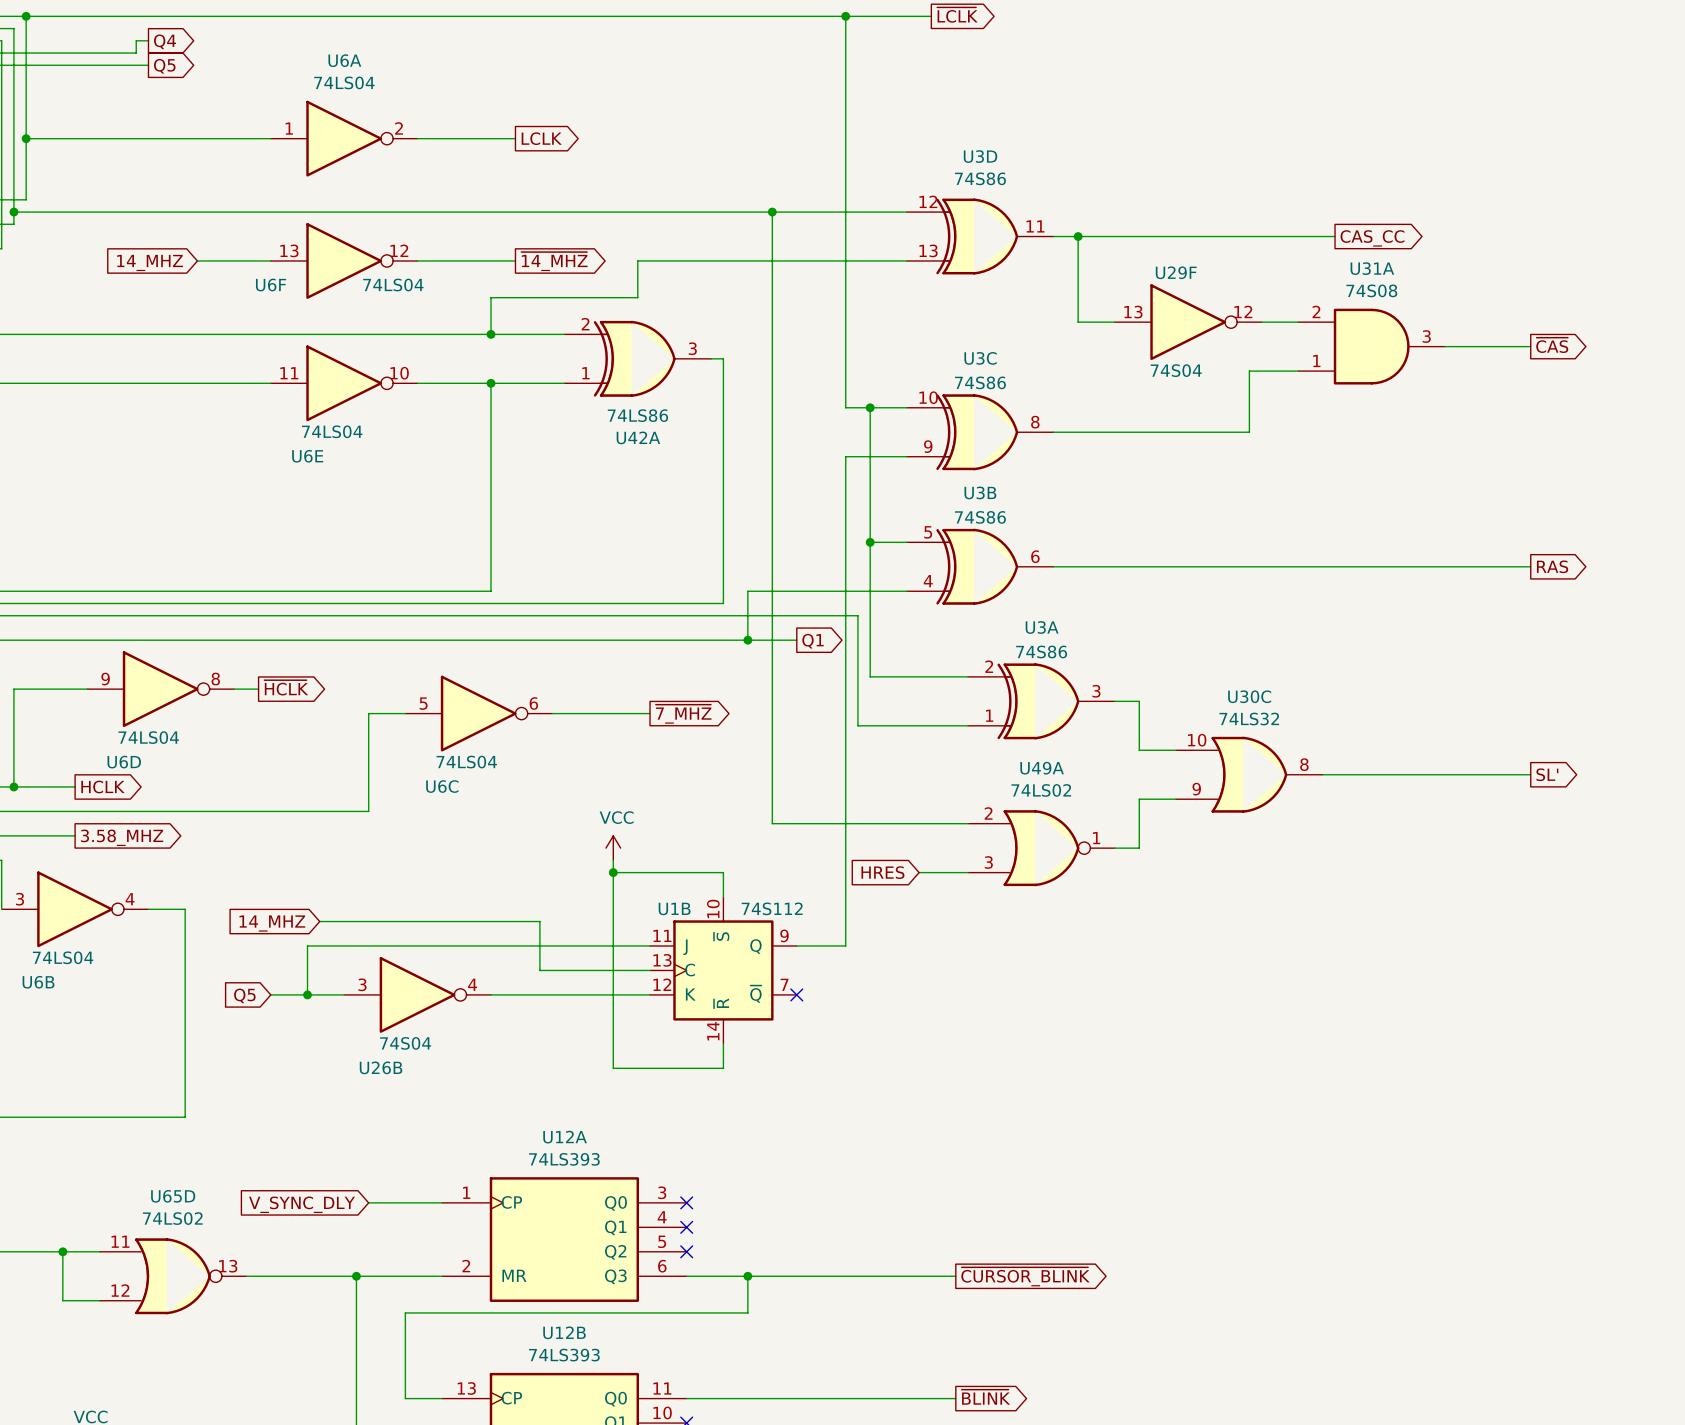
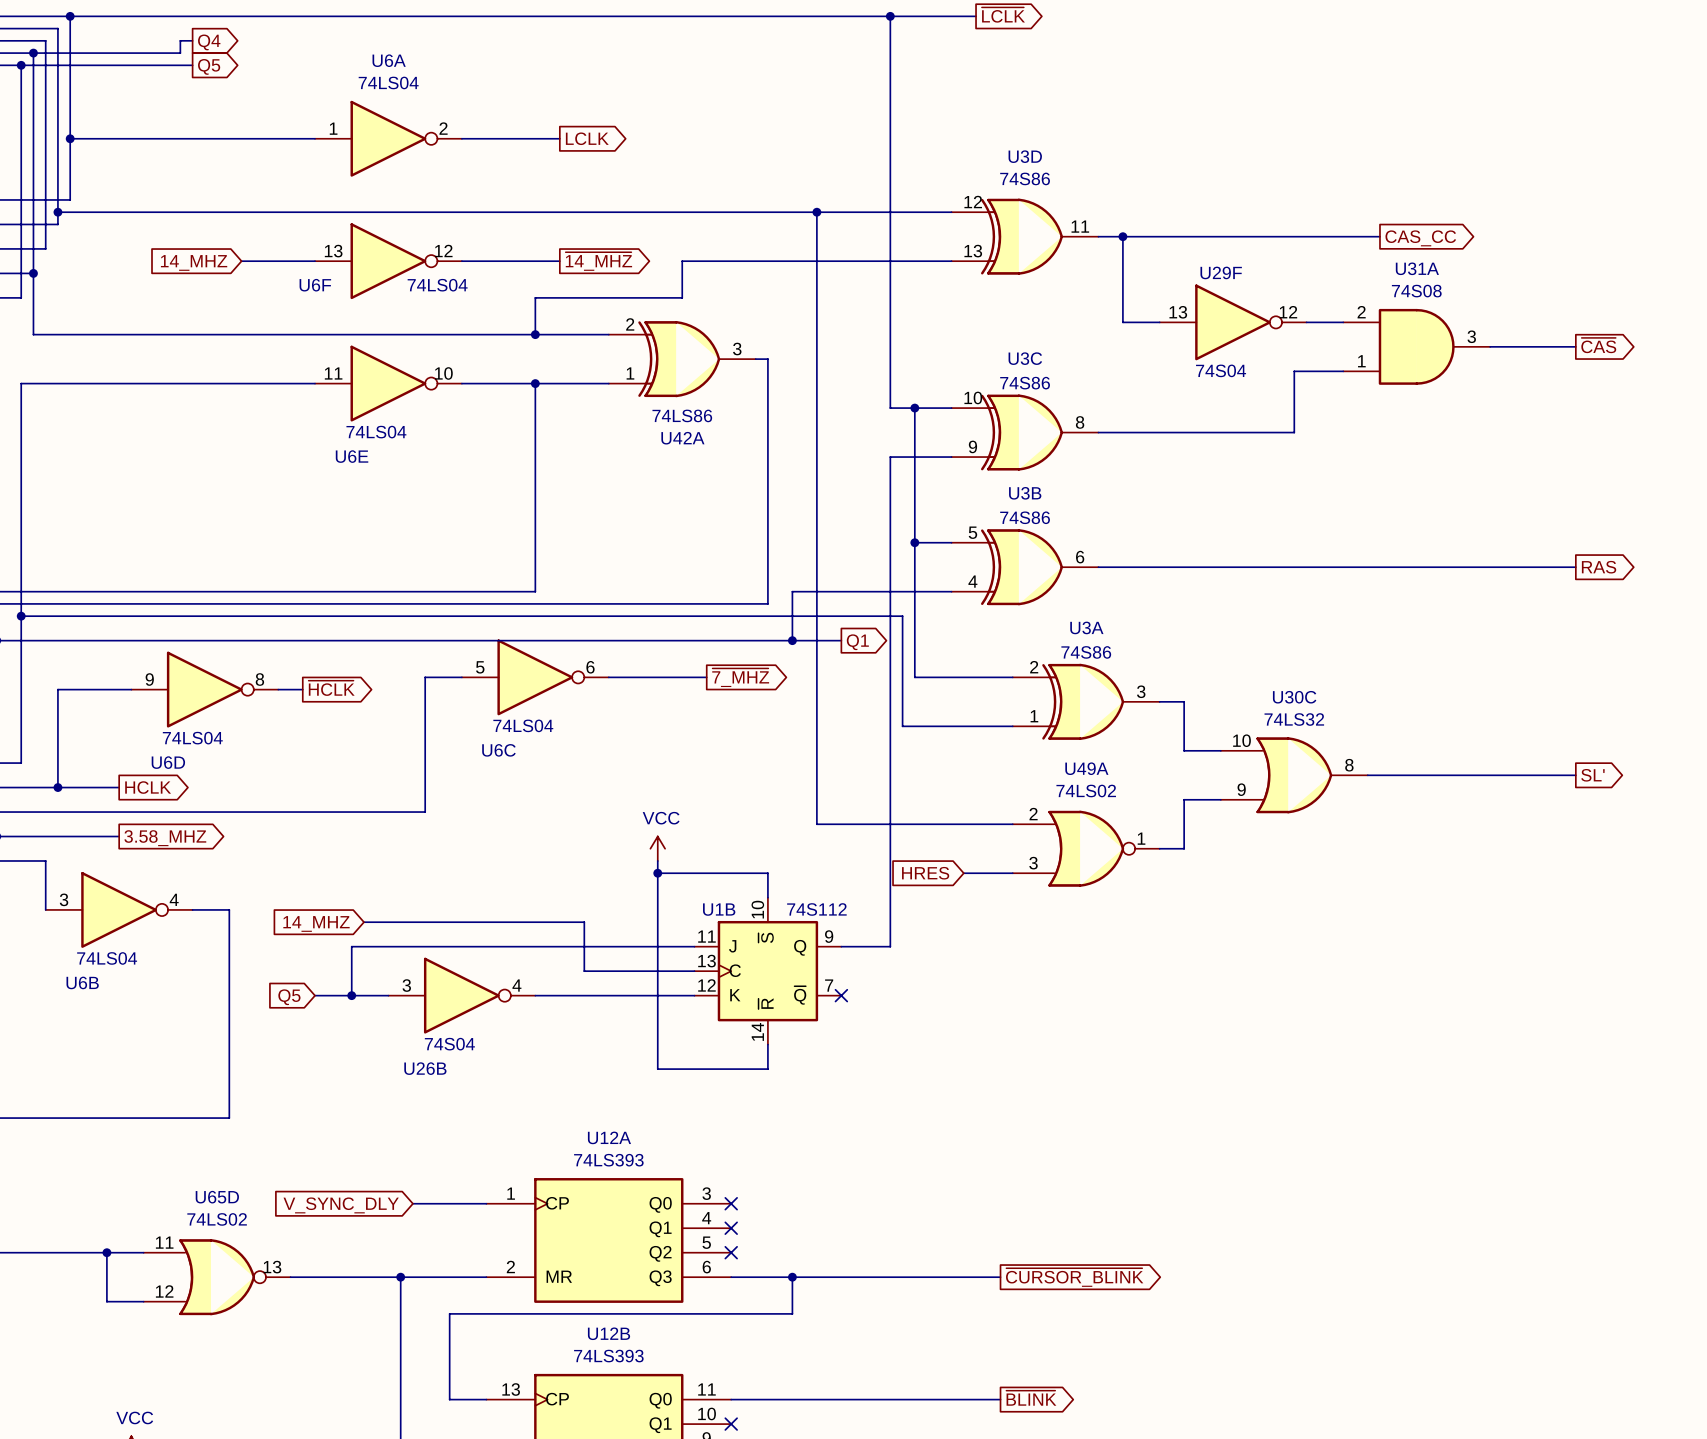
wire: (405, 713) (368, 713) (368, 811) -> (461, 677) (425, 677) (425, 812) (412, 812)
U6C position: (478, 713) -> (535, 677)
wire: (552, 713) (650, 713) -> (608, 677) (706, 677)
global label position: ~{7_MHZ} (683, 714) -> ~{7_MHZ} (740, 677)

